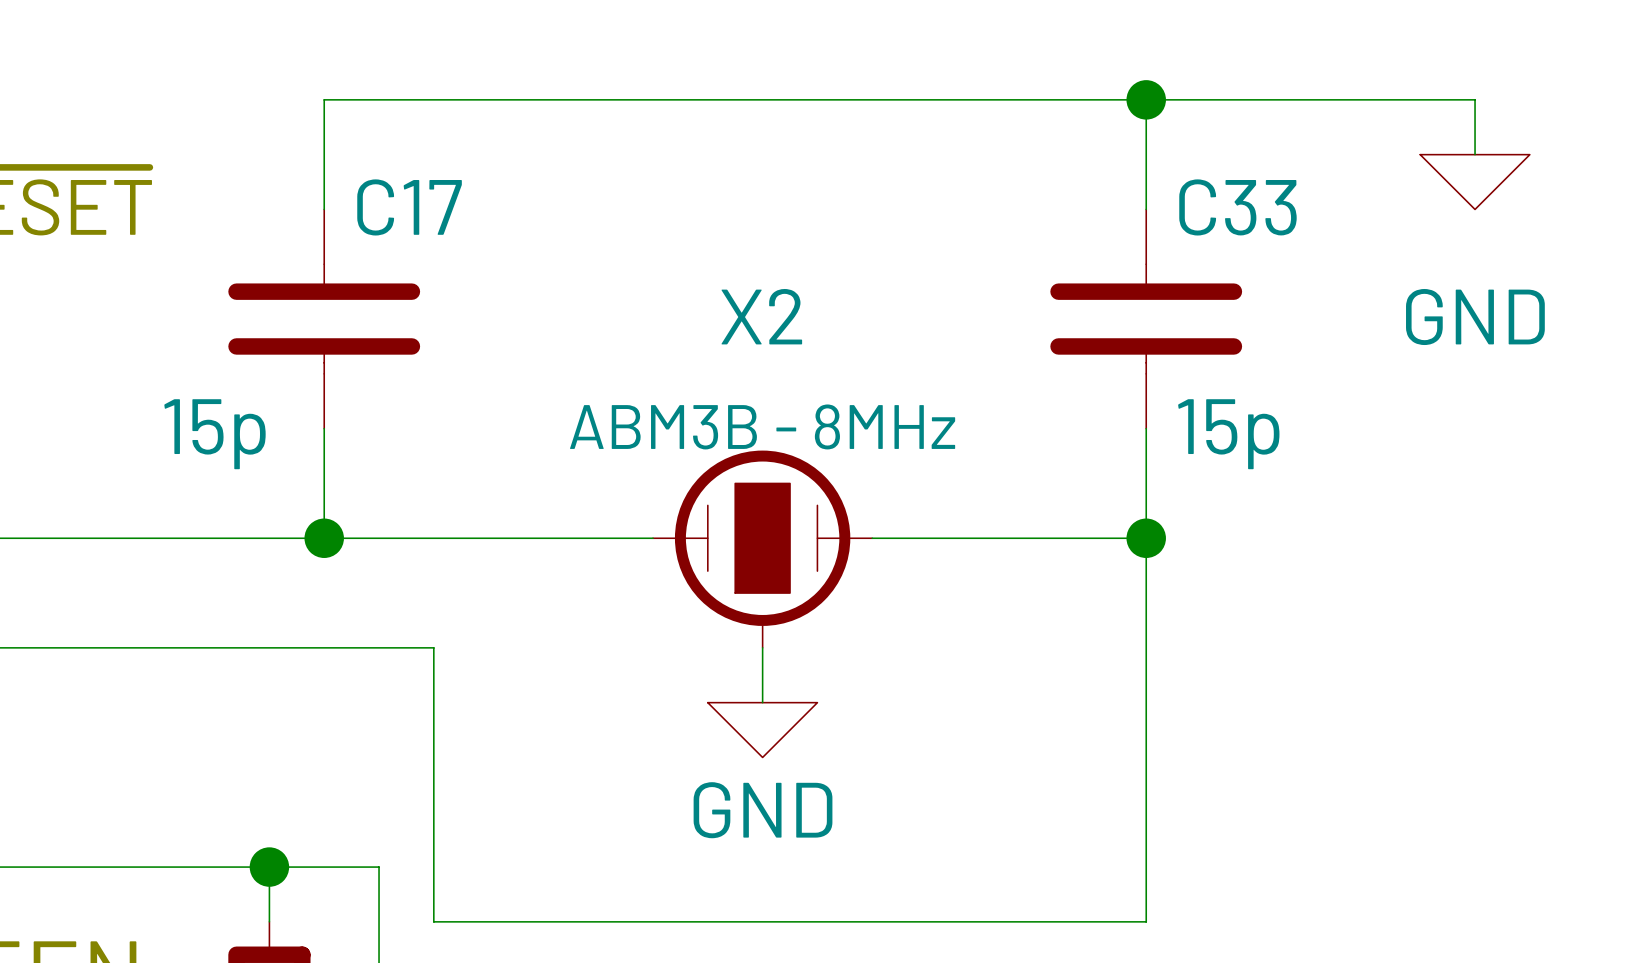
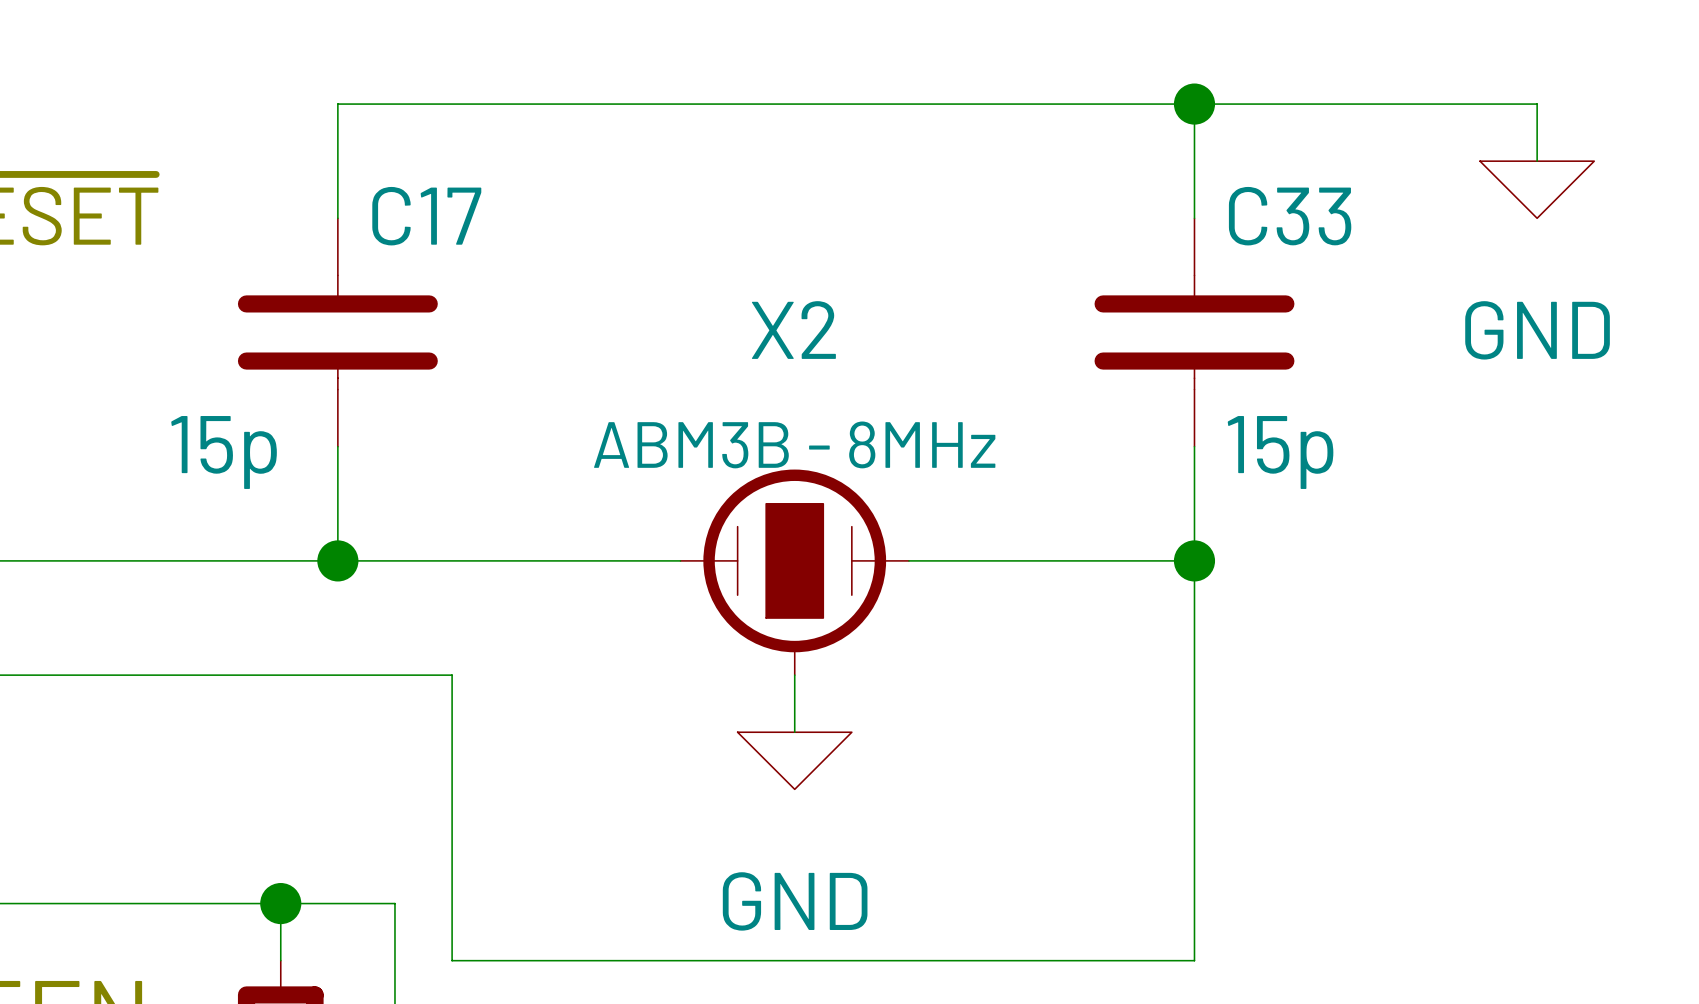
power symbol text position: GND (763, 810) -> GND (795, 901)

